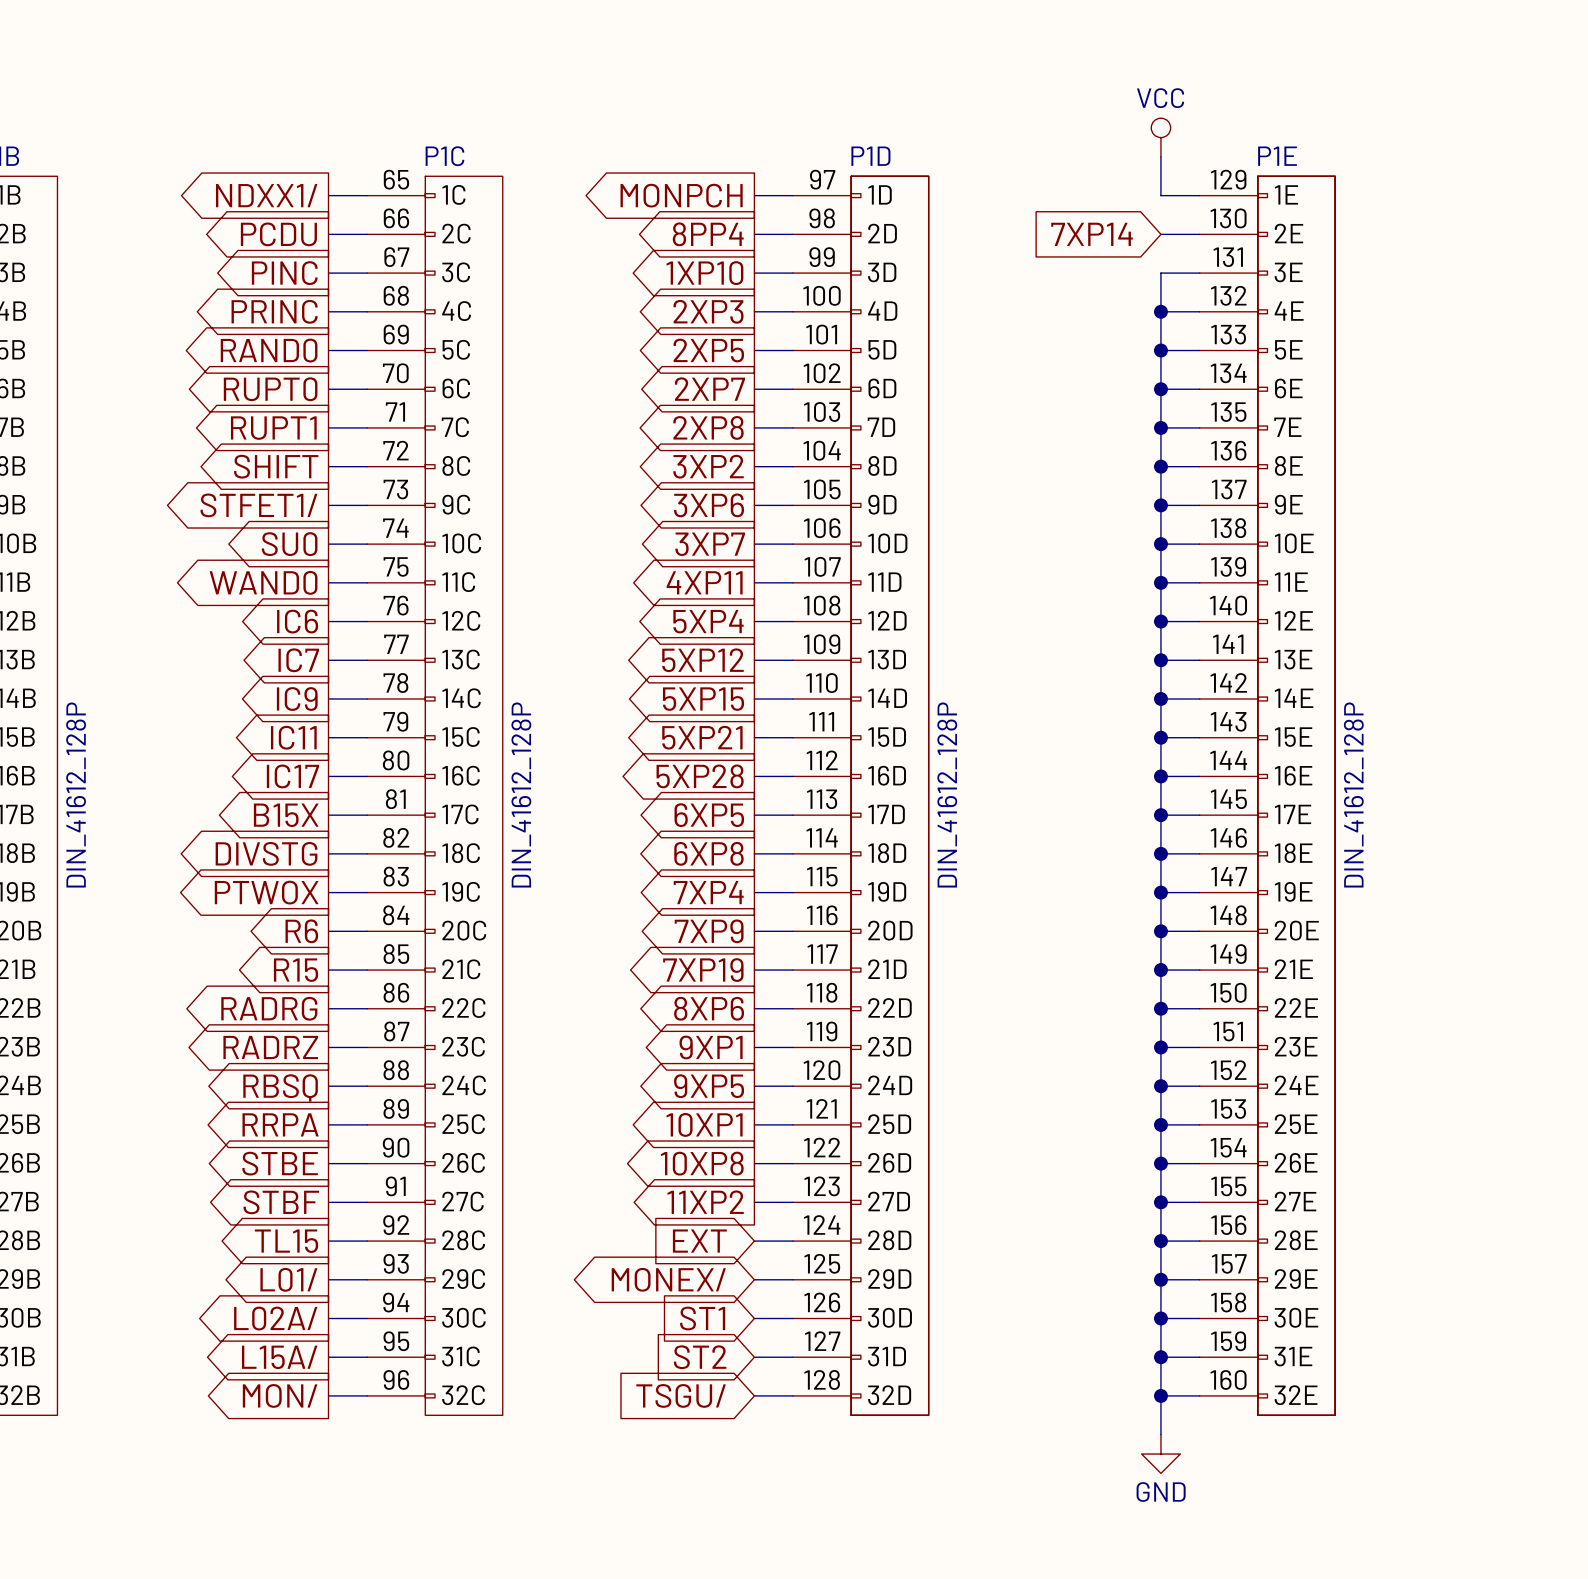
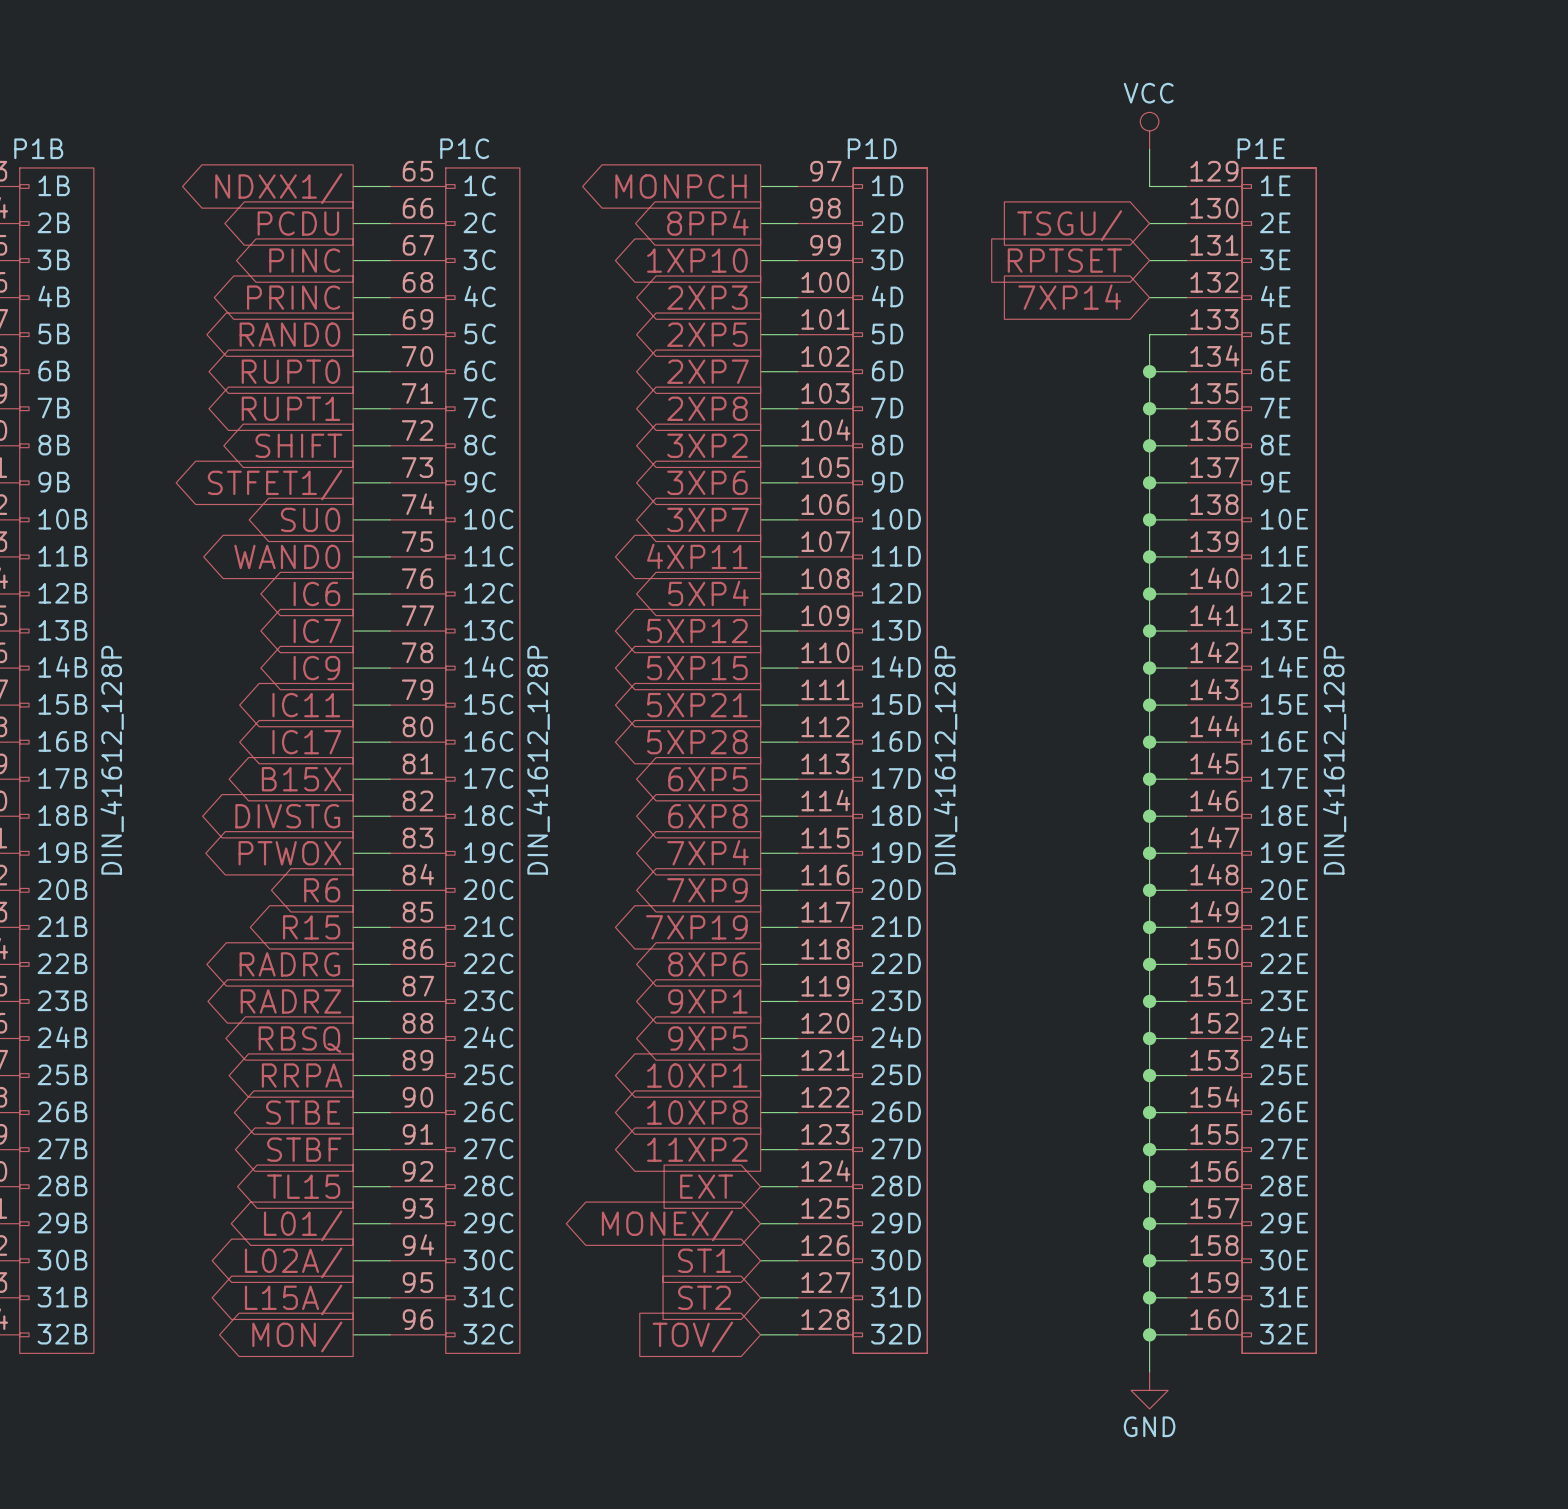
global label: 7XP14 (1092, 234) -> TSGU/ (1069, 225)
global label: none -> RPTSET (1064, 260)
wire: (1160, 273) (1160, 350) -> none
global label: none -> 7XP14 (1069, 297)
junction: (1160, 311) -> none
junction: (1160, 350) -> none
global label: TSGU/ (681, 1395) -> TOV/ (692, 1336)

